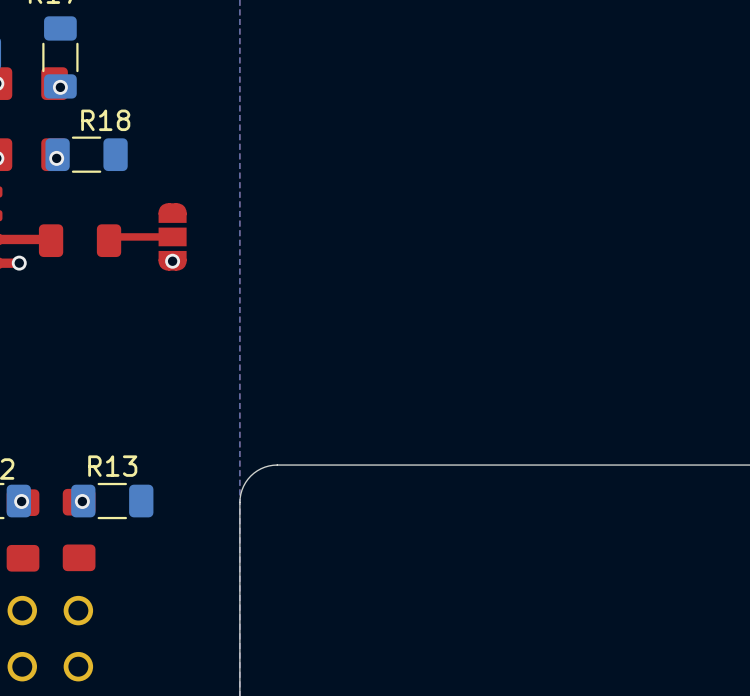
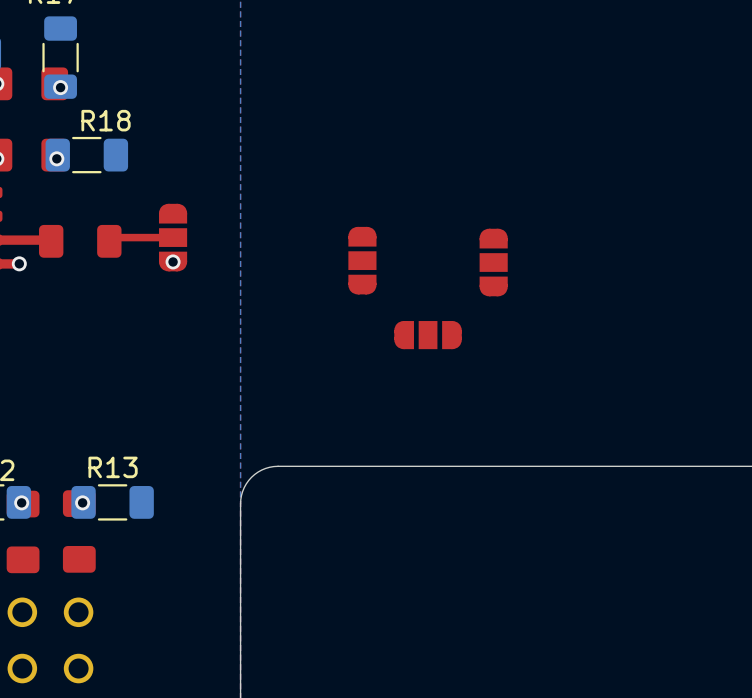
part: none -> (362, 260)
part: none -> (493, 262)
part: none -> (428, 335)

